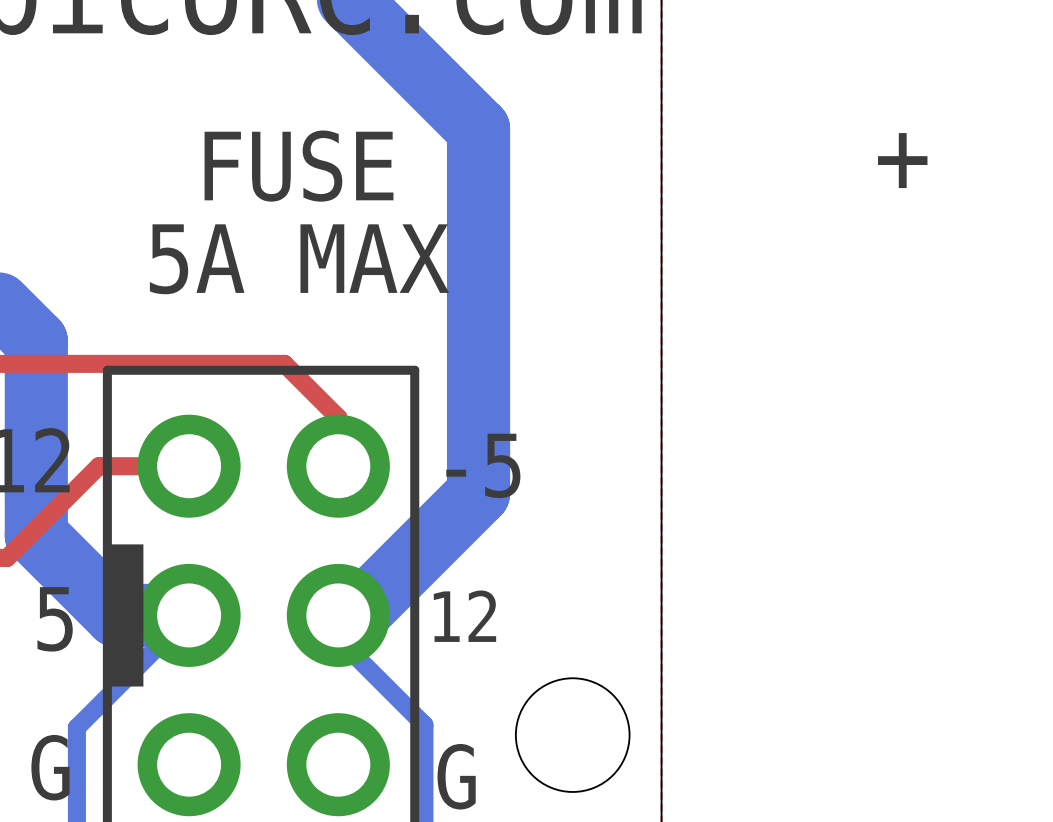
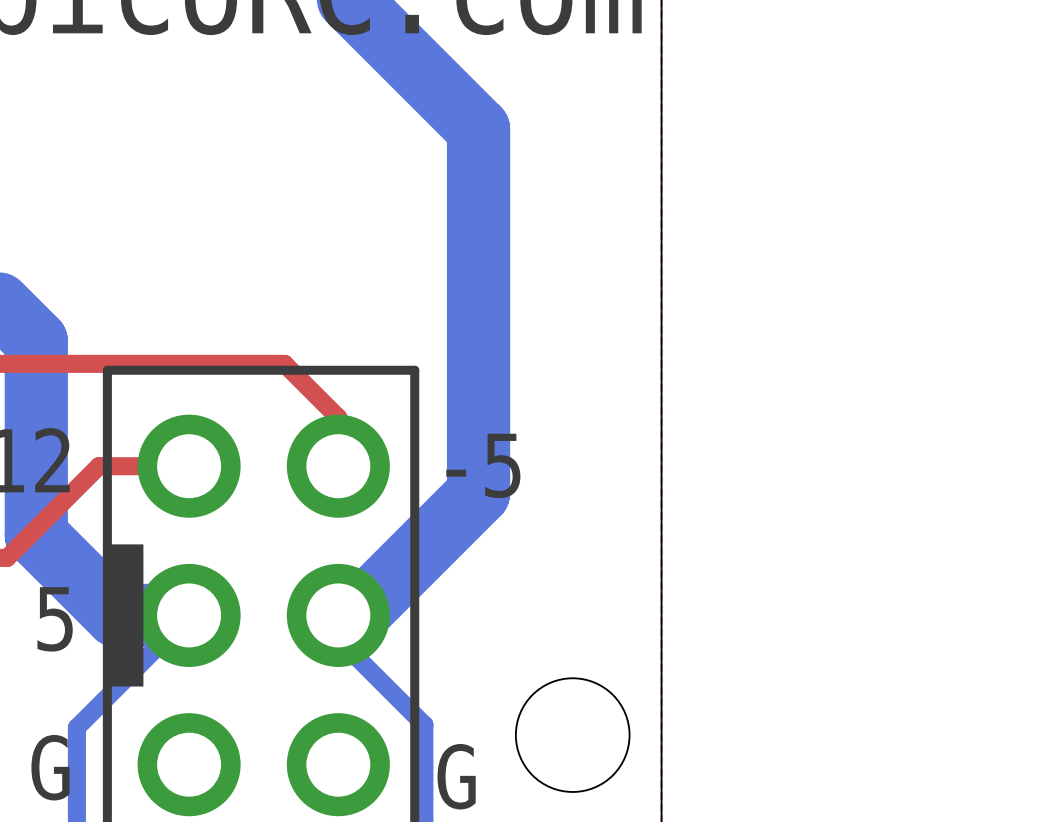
text: + (902, 160) -> none
text: FUSE (299, 166) -> none
text: 5A MAX (299, 259) -> none
text: 12 (464, 616) -> none

